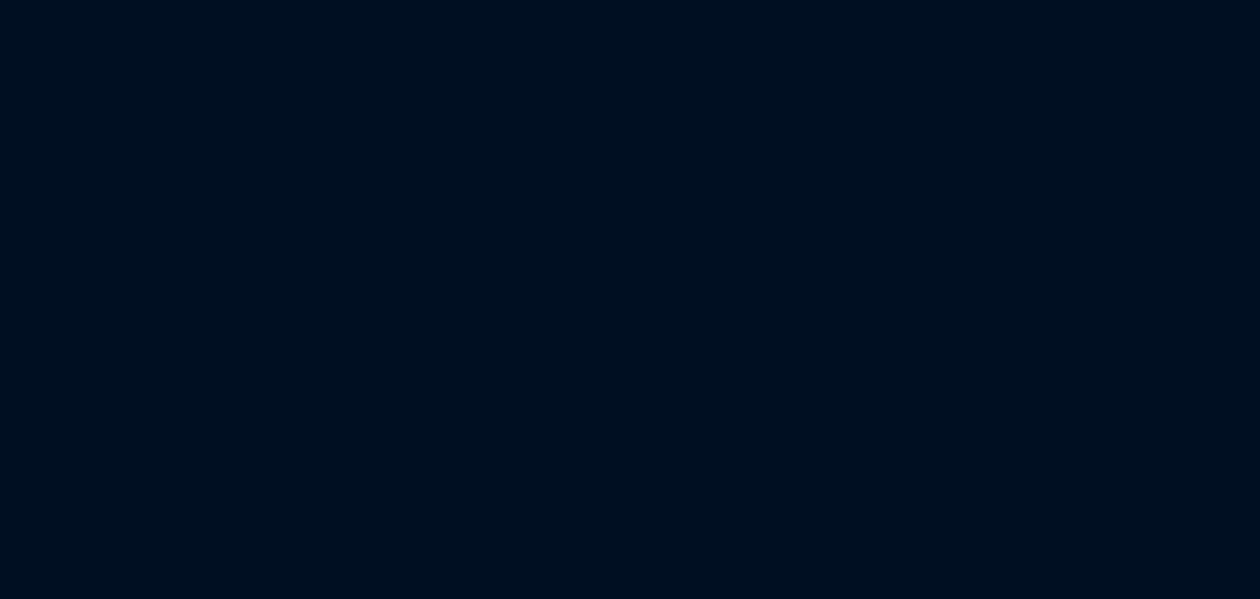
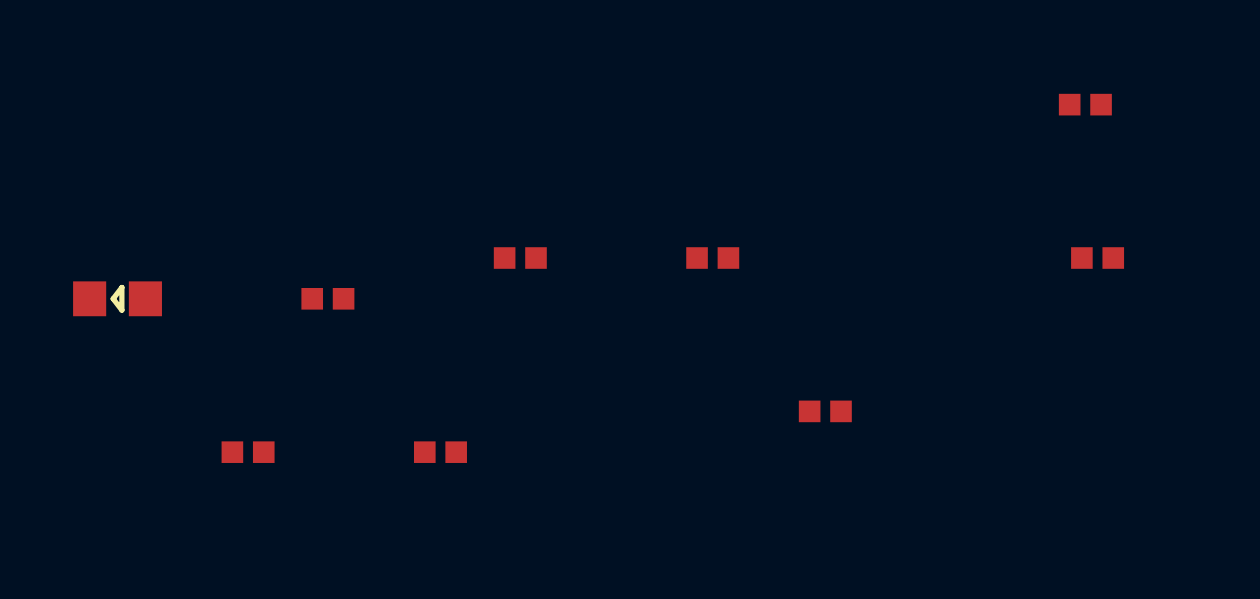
part: none -> (1085, 104)
part: none -> (520, 258)
part: none -> (712, 258)
part: none -> (1097, 258)
part: none -> (117, 298)
part: none -> (327, 298)
part: none -> (825, 411)
part: none -> (248, 452)
part: none -> (440, 452)

